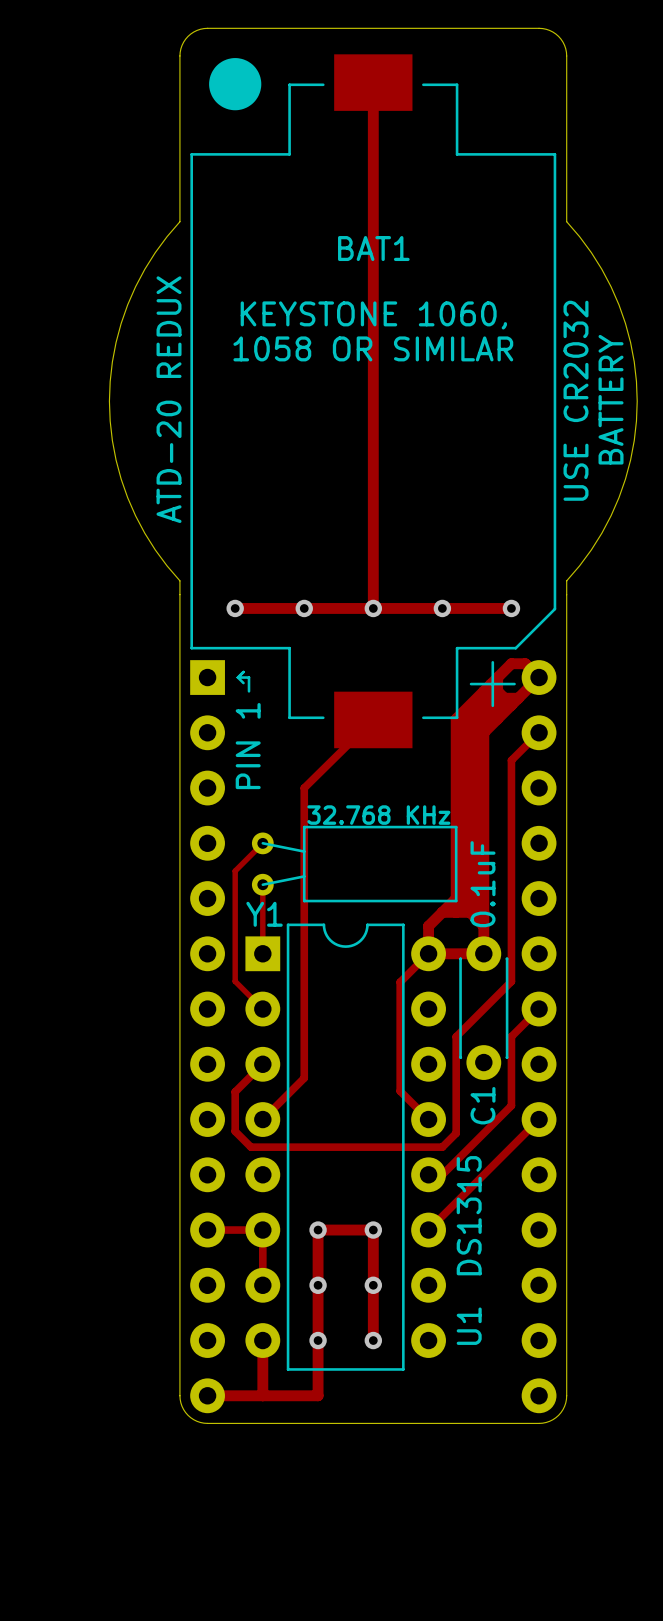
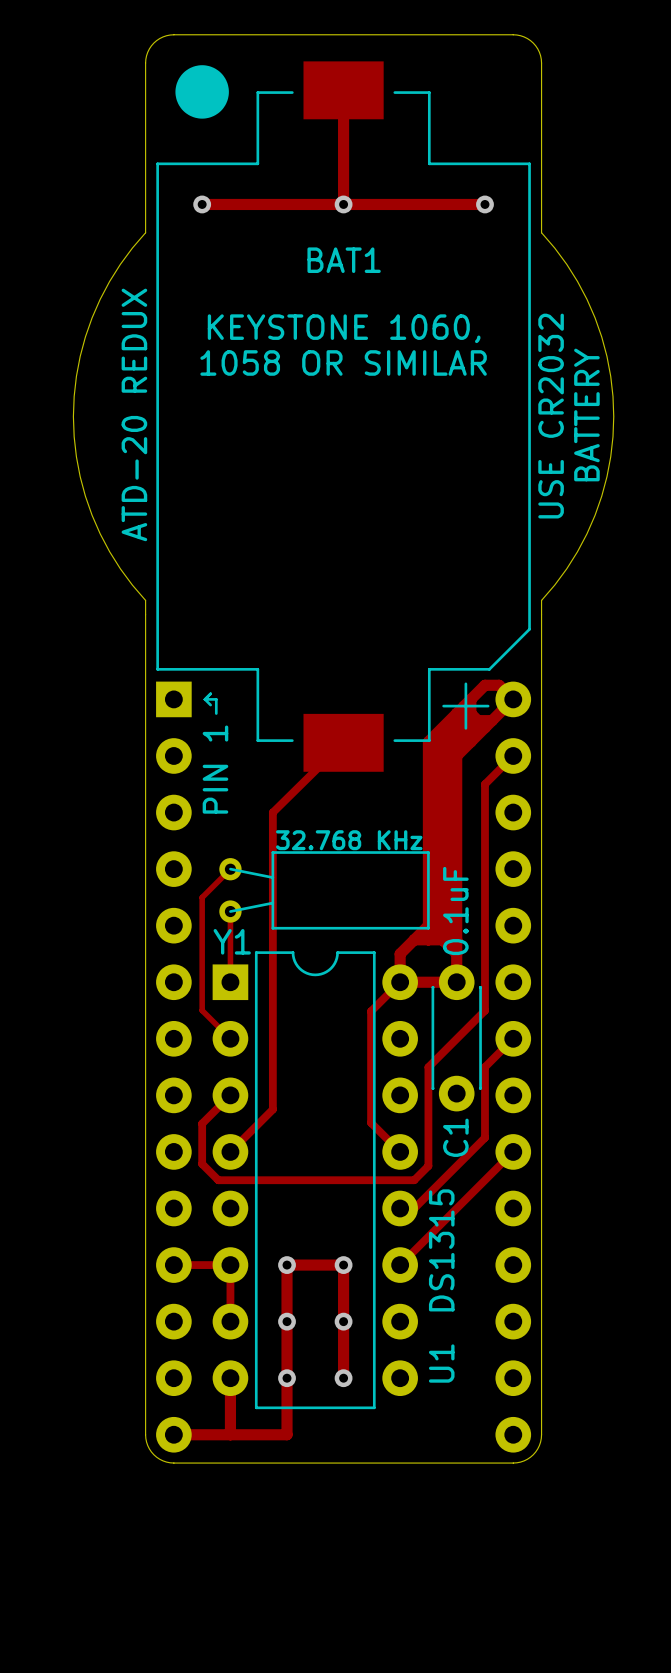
via: none -> (202, 204)
track: (373, 194) (373, 608) -> none
via: none -> (343, 204)
via: none -> (484, 204)
track: (235, 608) (511, 608) -> (202, 204) (484, 204)
via: (235, 608) -> none
via: (304, 608) -> none
via: (373, 608) -> none
via: (442, 608) -> none
via: (511, 608) -> none

